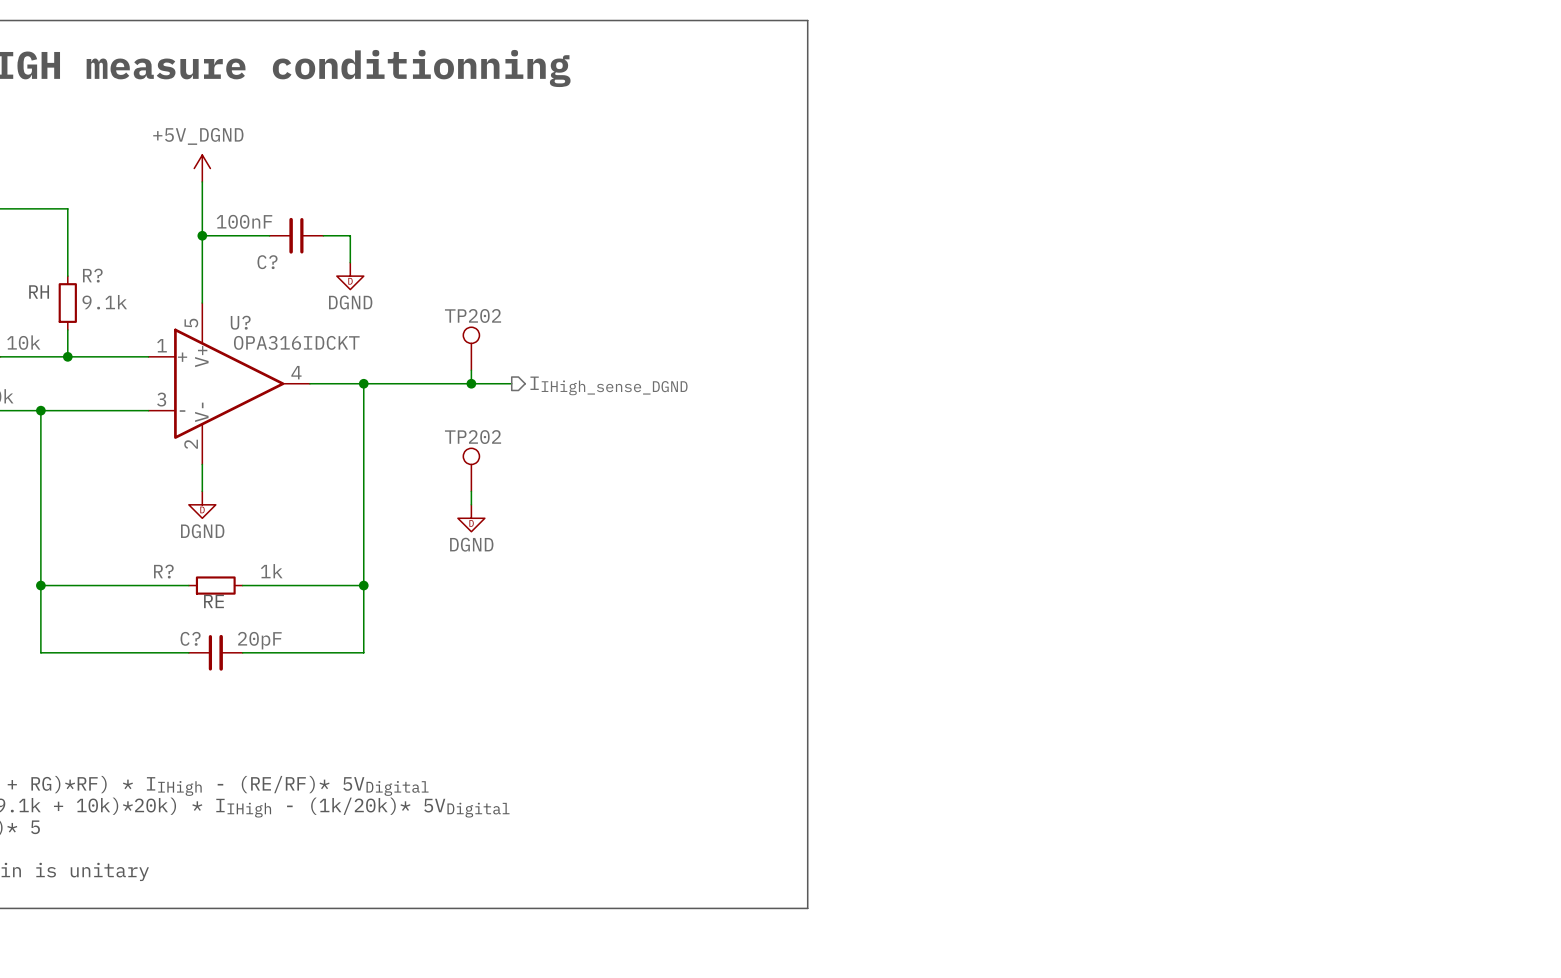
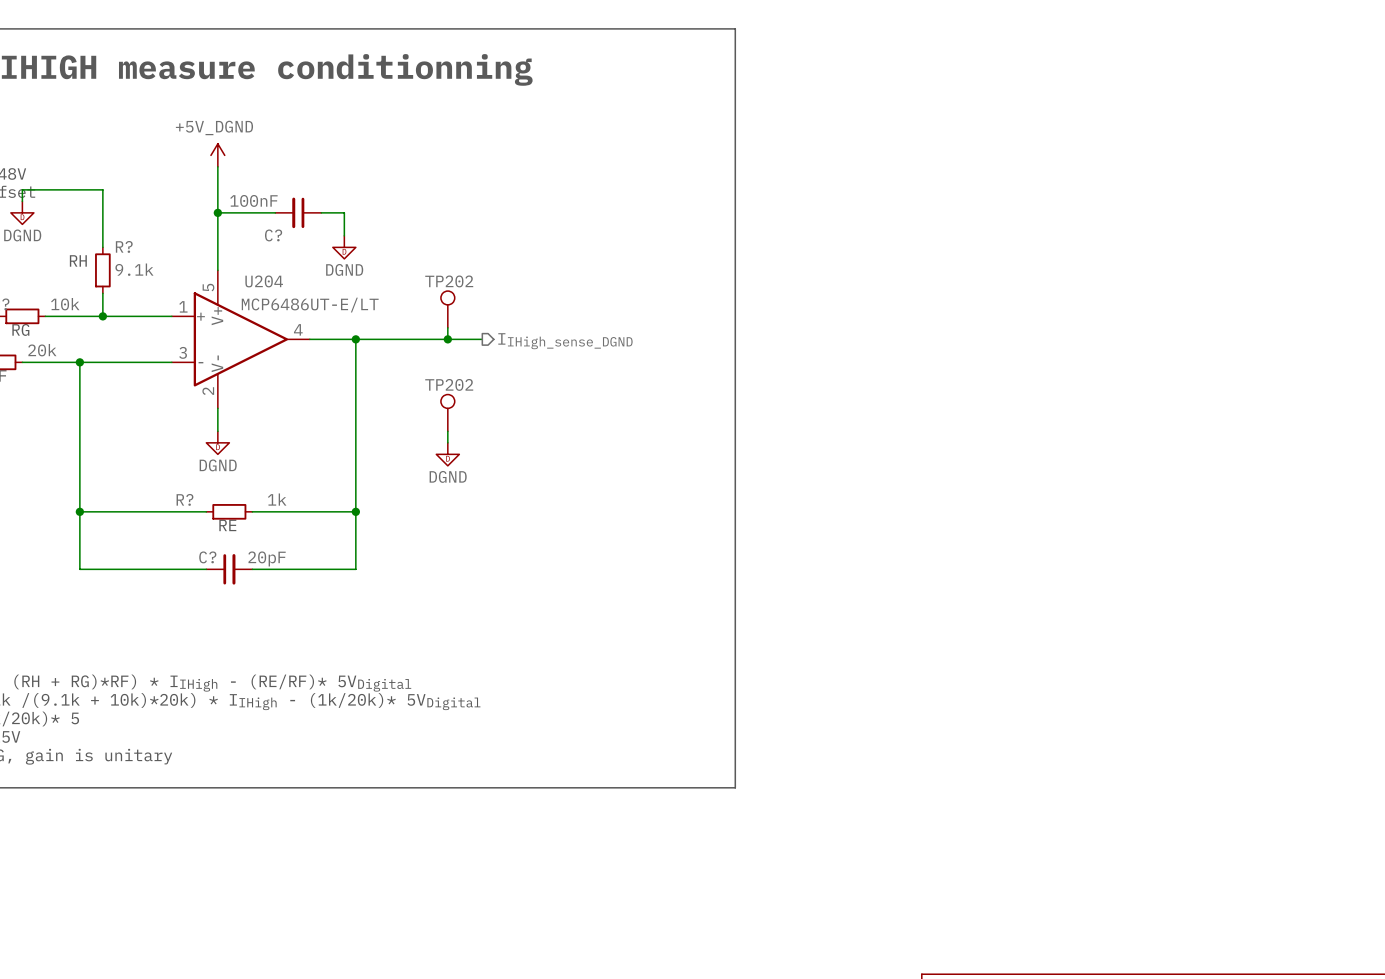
U? name: U? (240, 322) -> U204 (264, 281)
U? text: OPA316IDCKT (296, 342) -> MCP6486UT-E/LT (310, 305)

